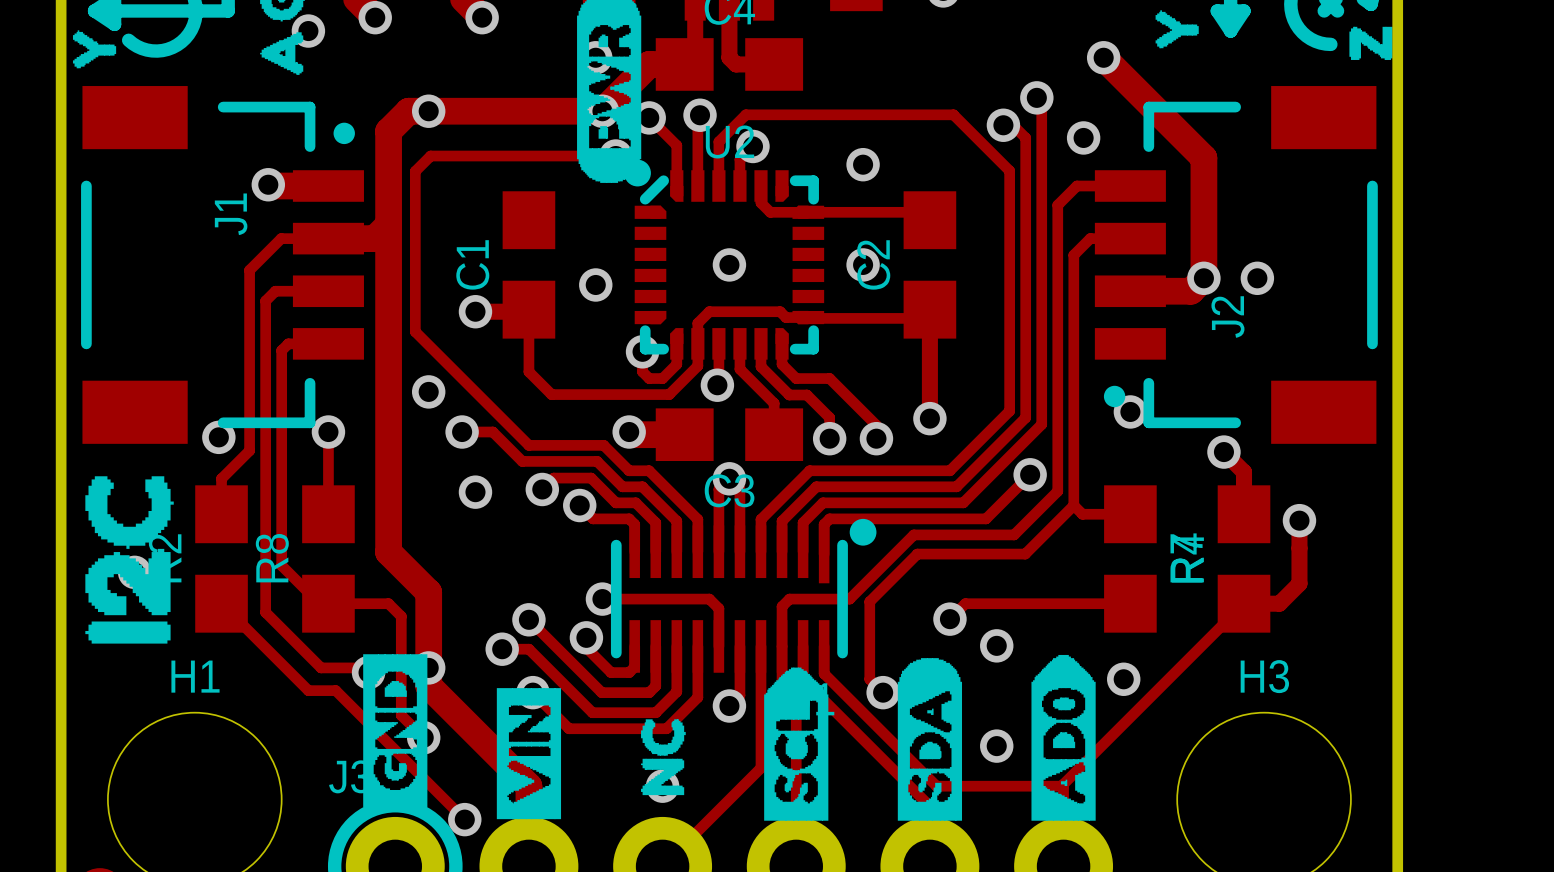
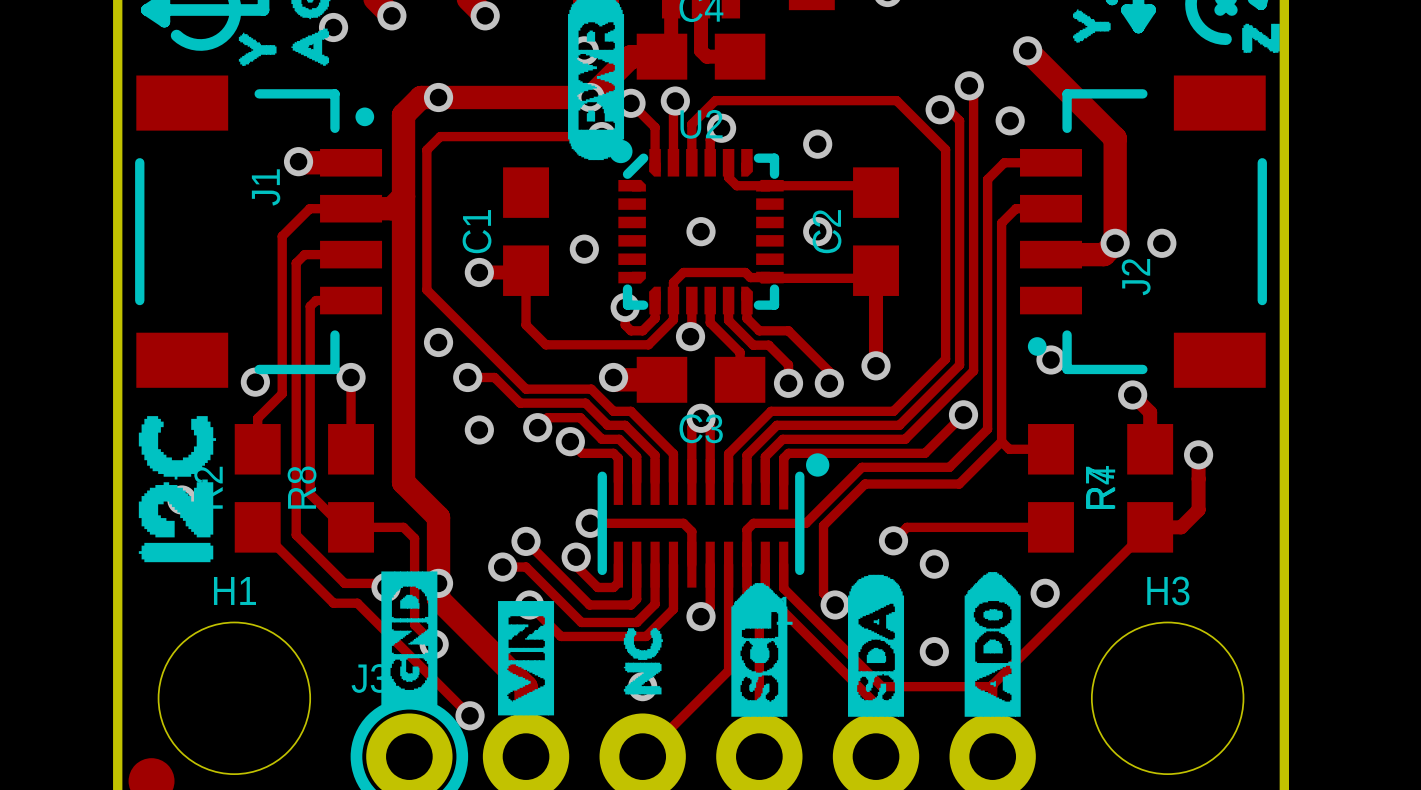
drawing position: (94, 49) -> (257, 49)

